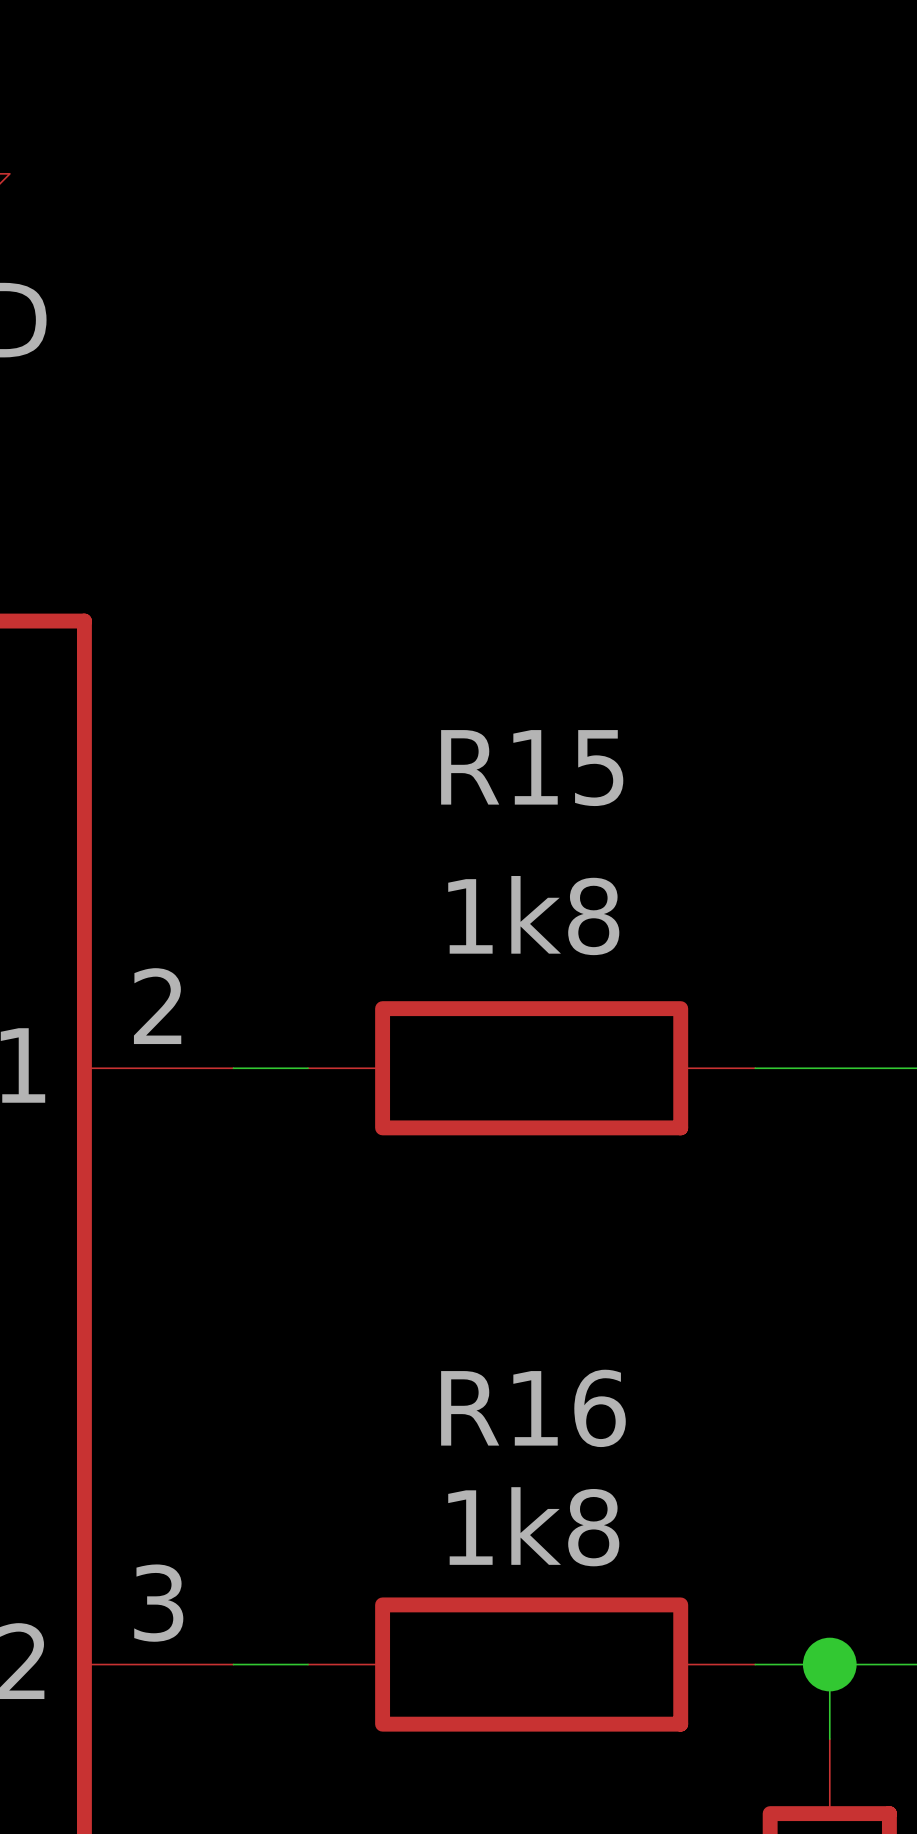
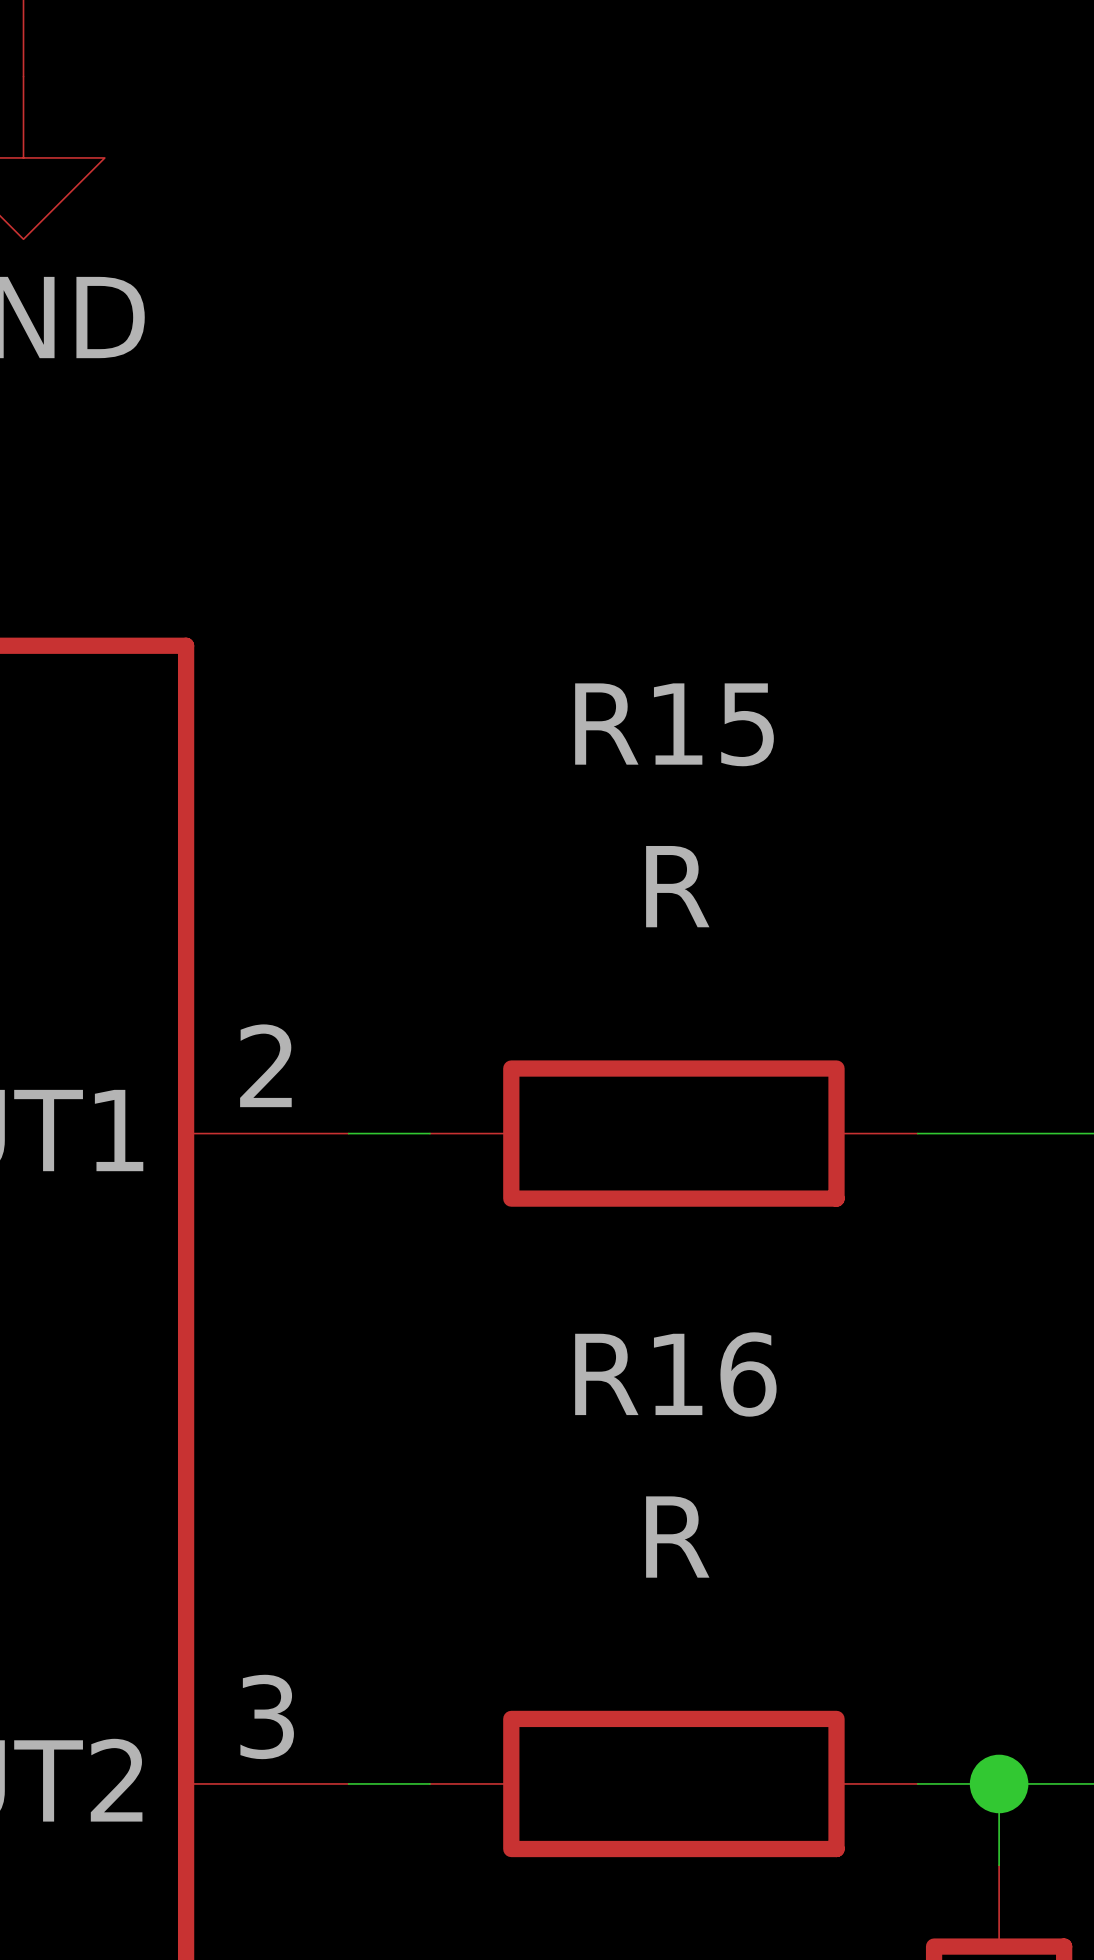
R15 name position: R15 (532, 768) -> R15 (674, 724)
R15 value: 1k8 (533, 915) -> R (677, 886)
R16 name position: R16 (533, 1408) -> R16 (675, 1374)
R16 value: 1k8 (533, 1526) -> R (677, 1537)

